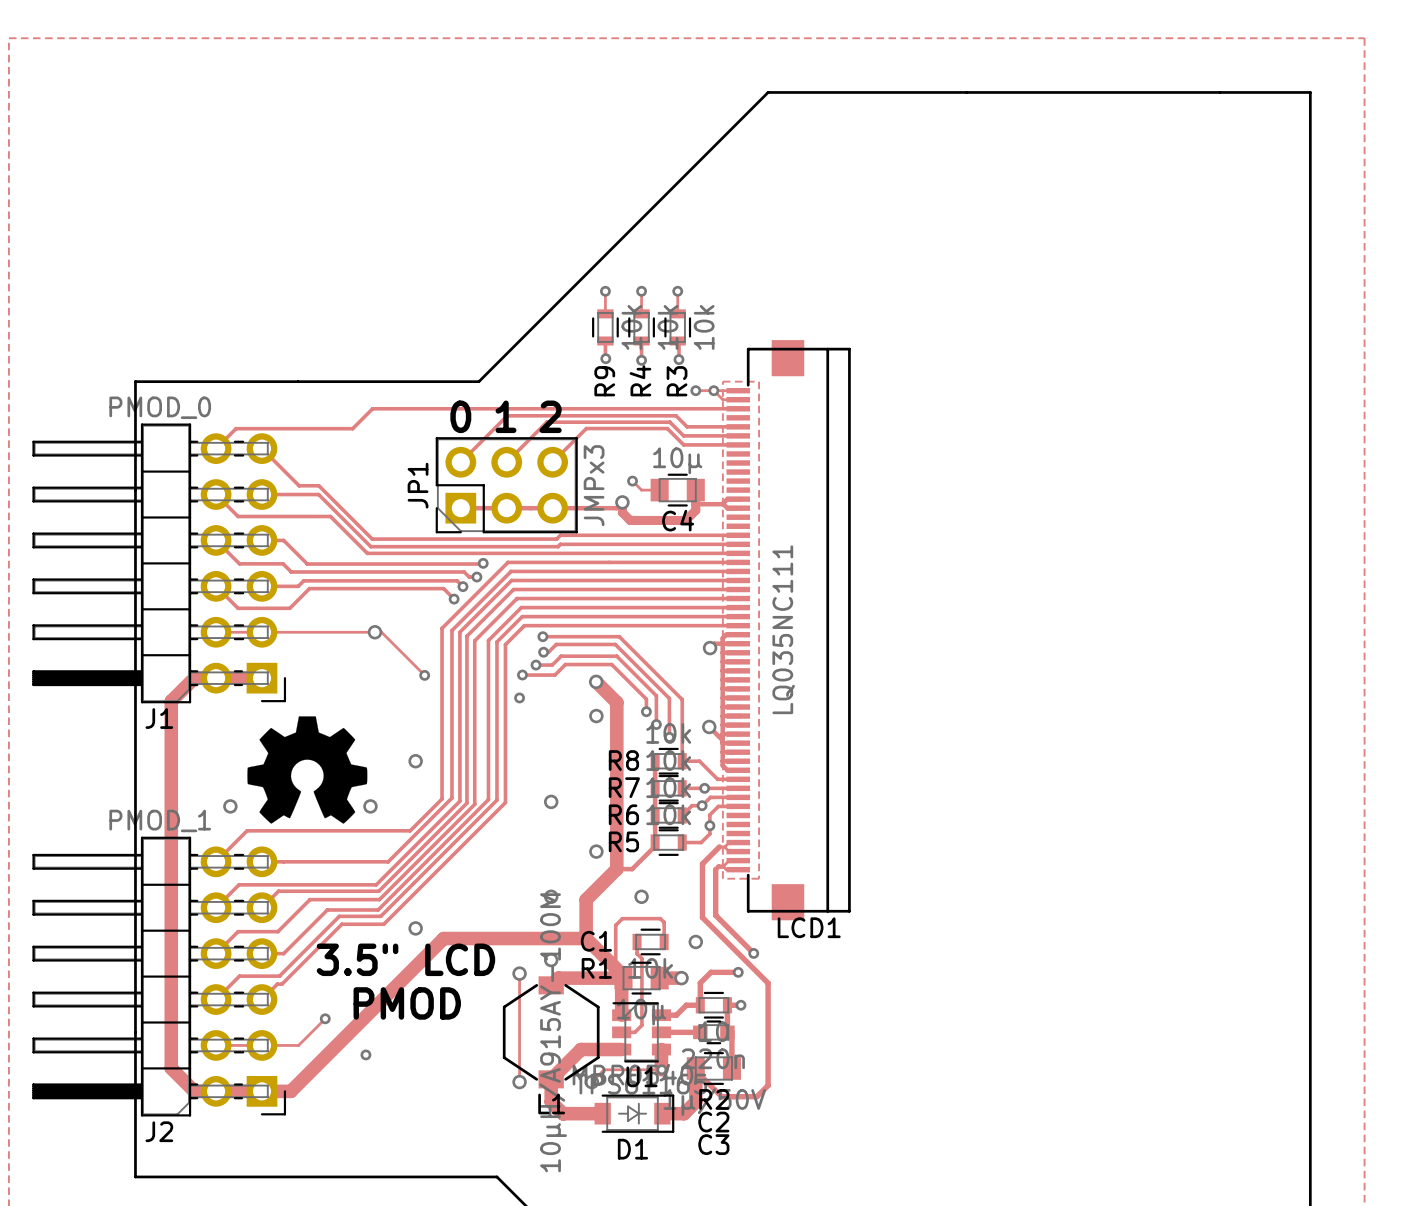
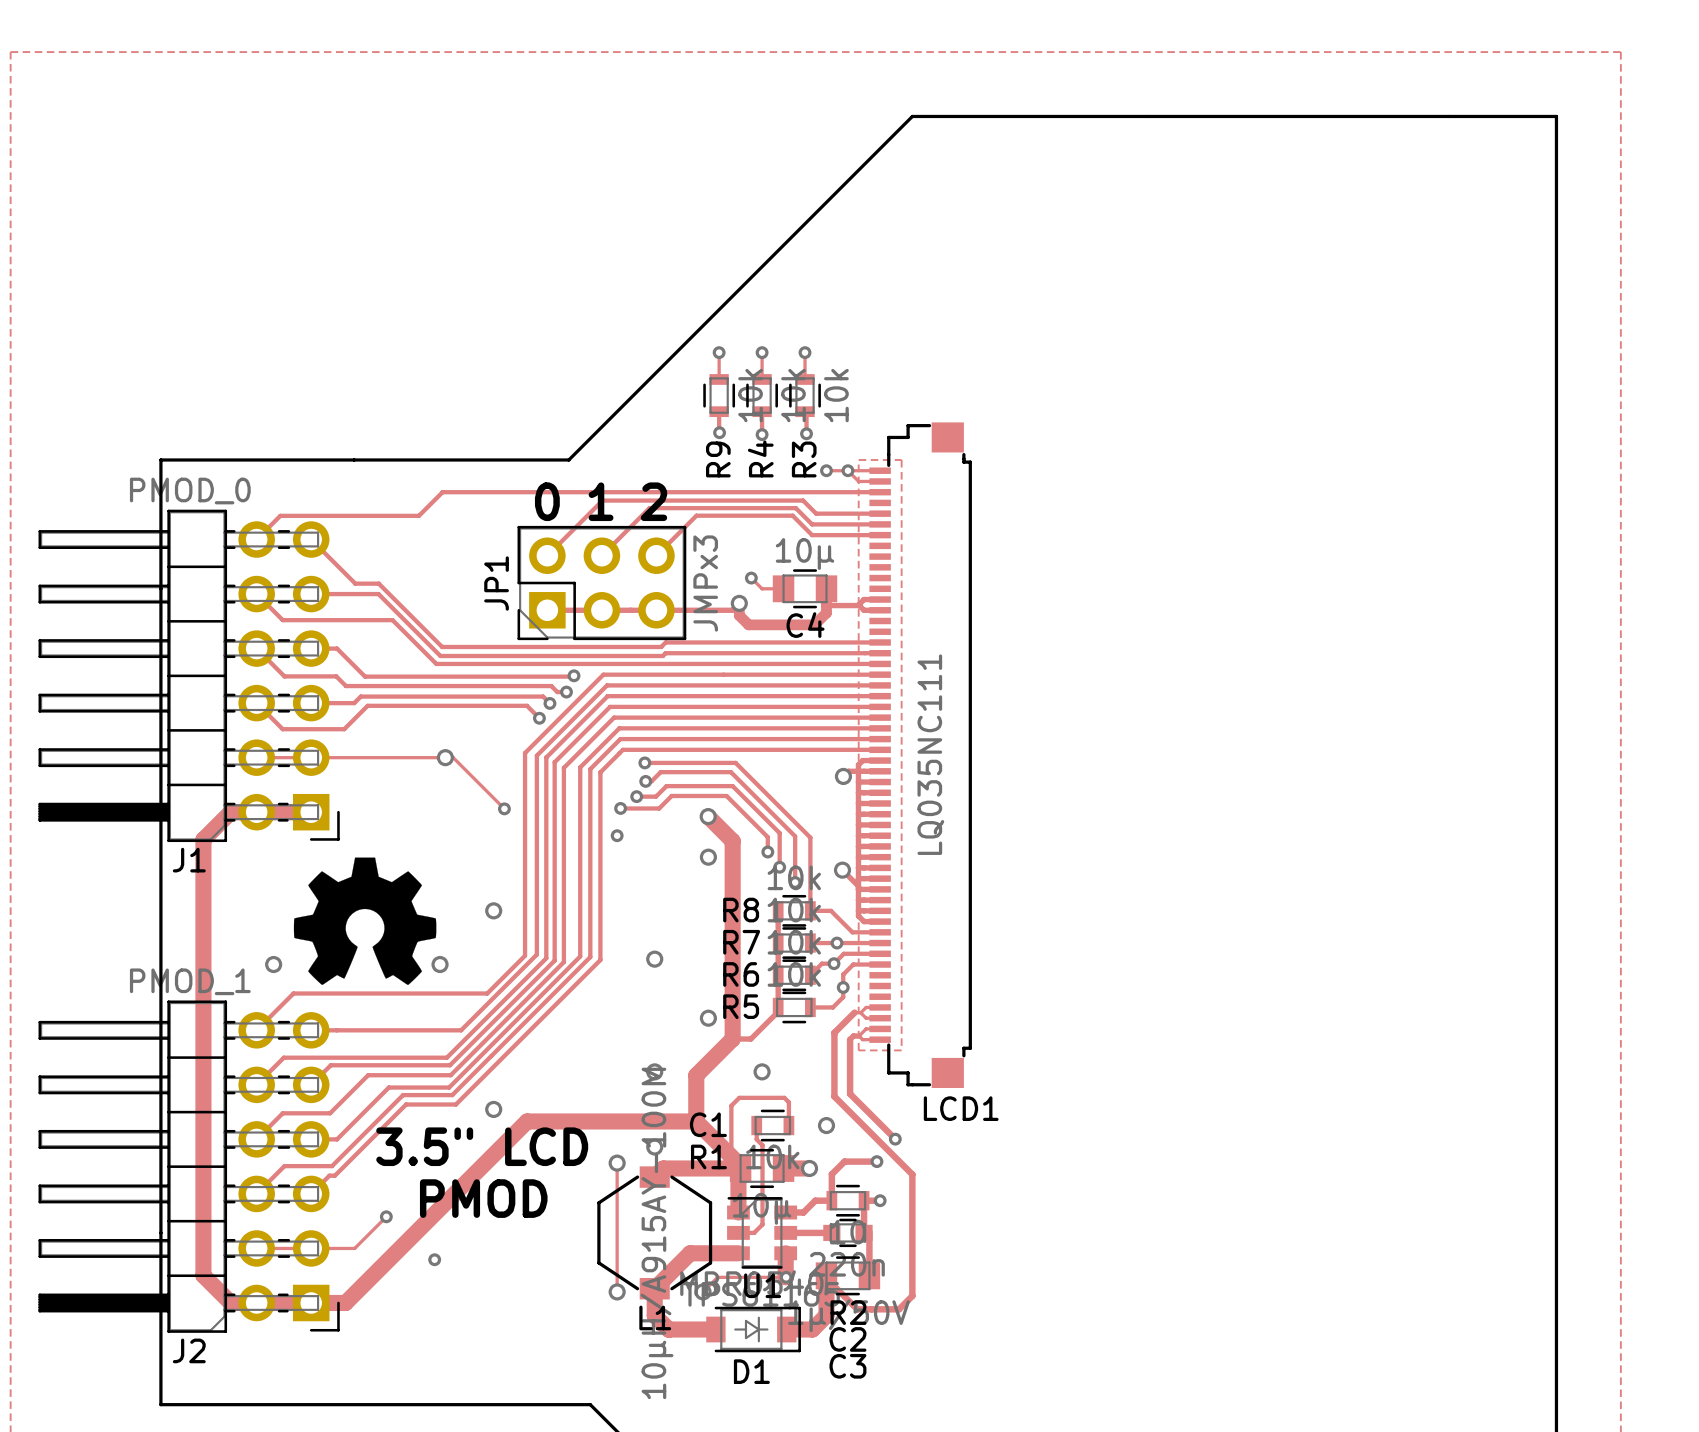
LCD1 footprint: [726, 340, 851, 921] -> [869, 422, 972, 1088]

